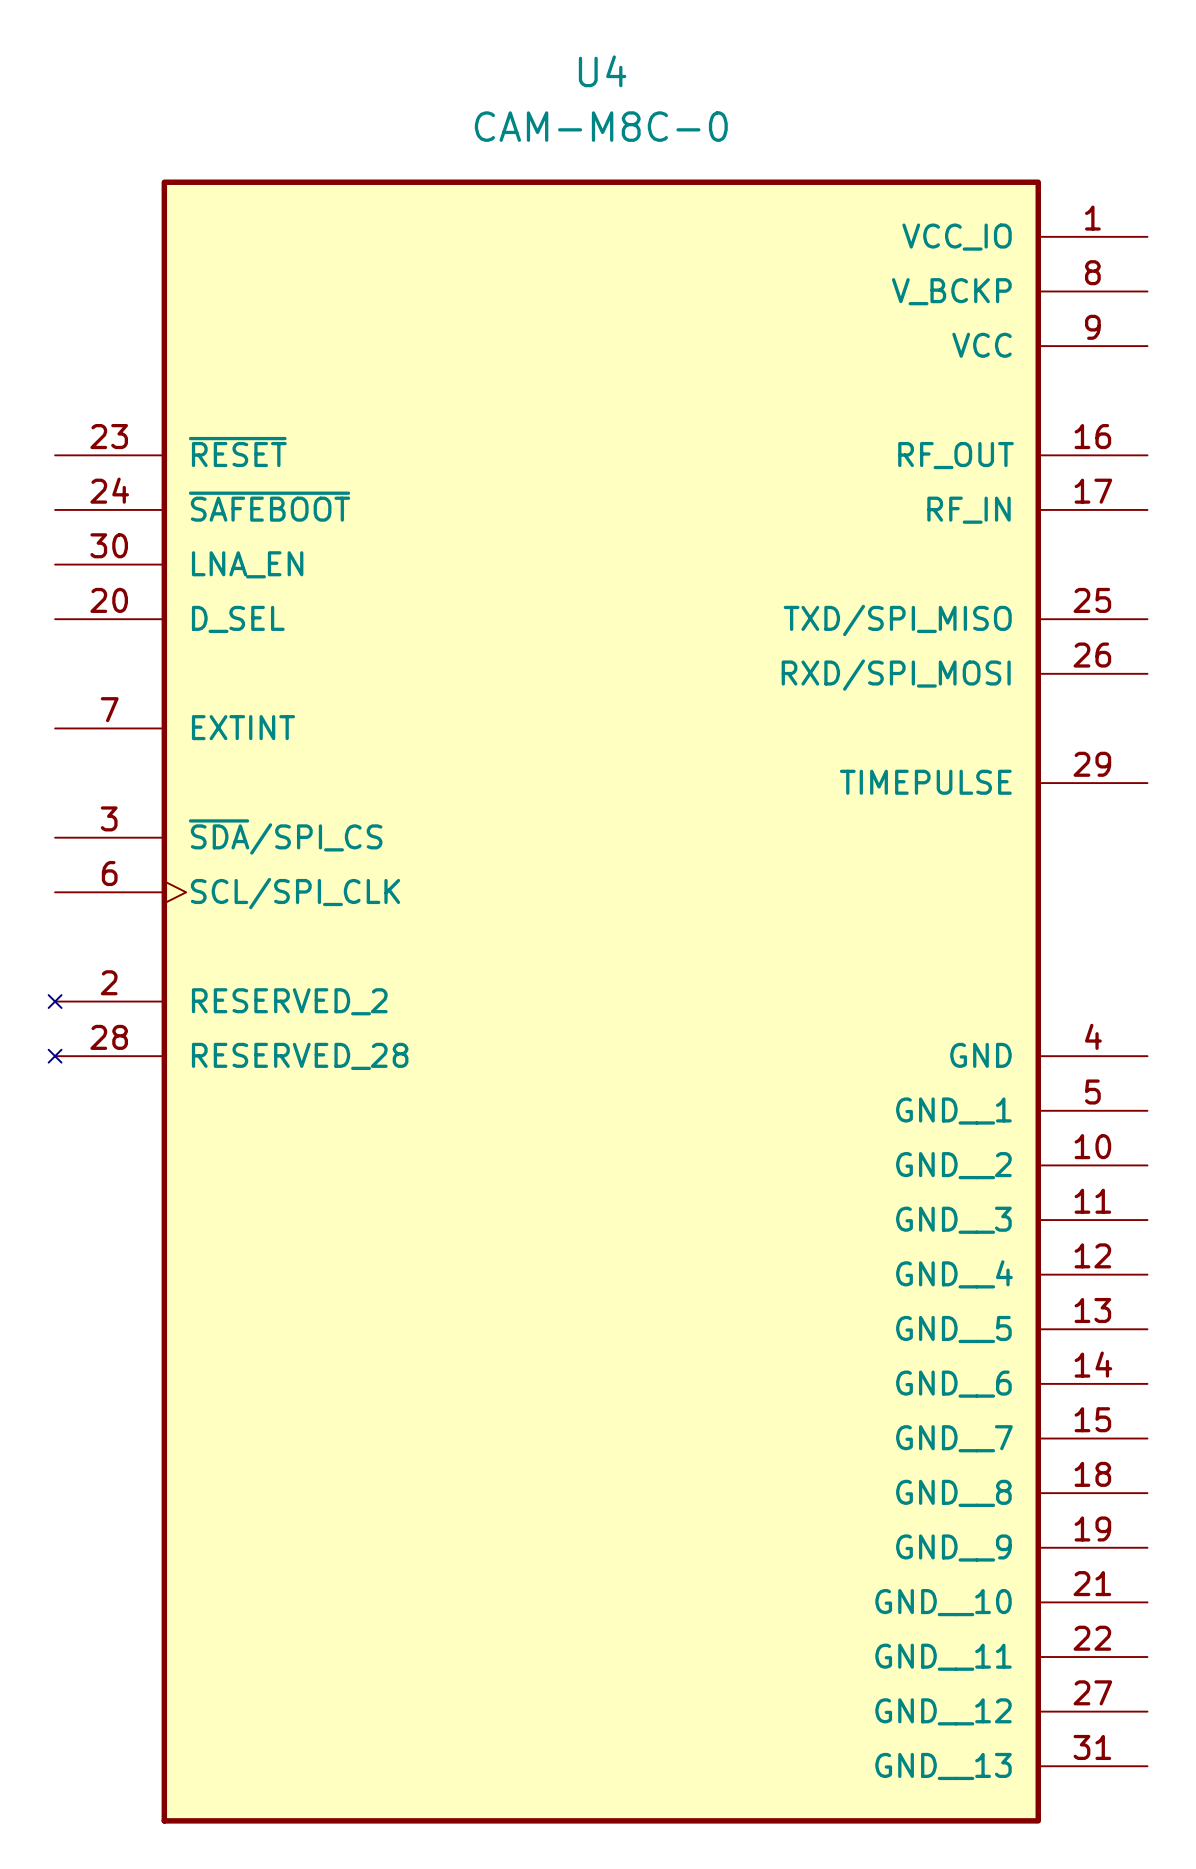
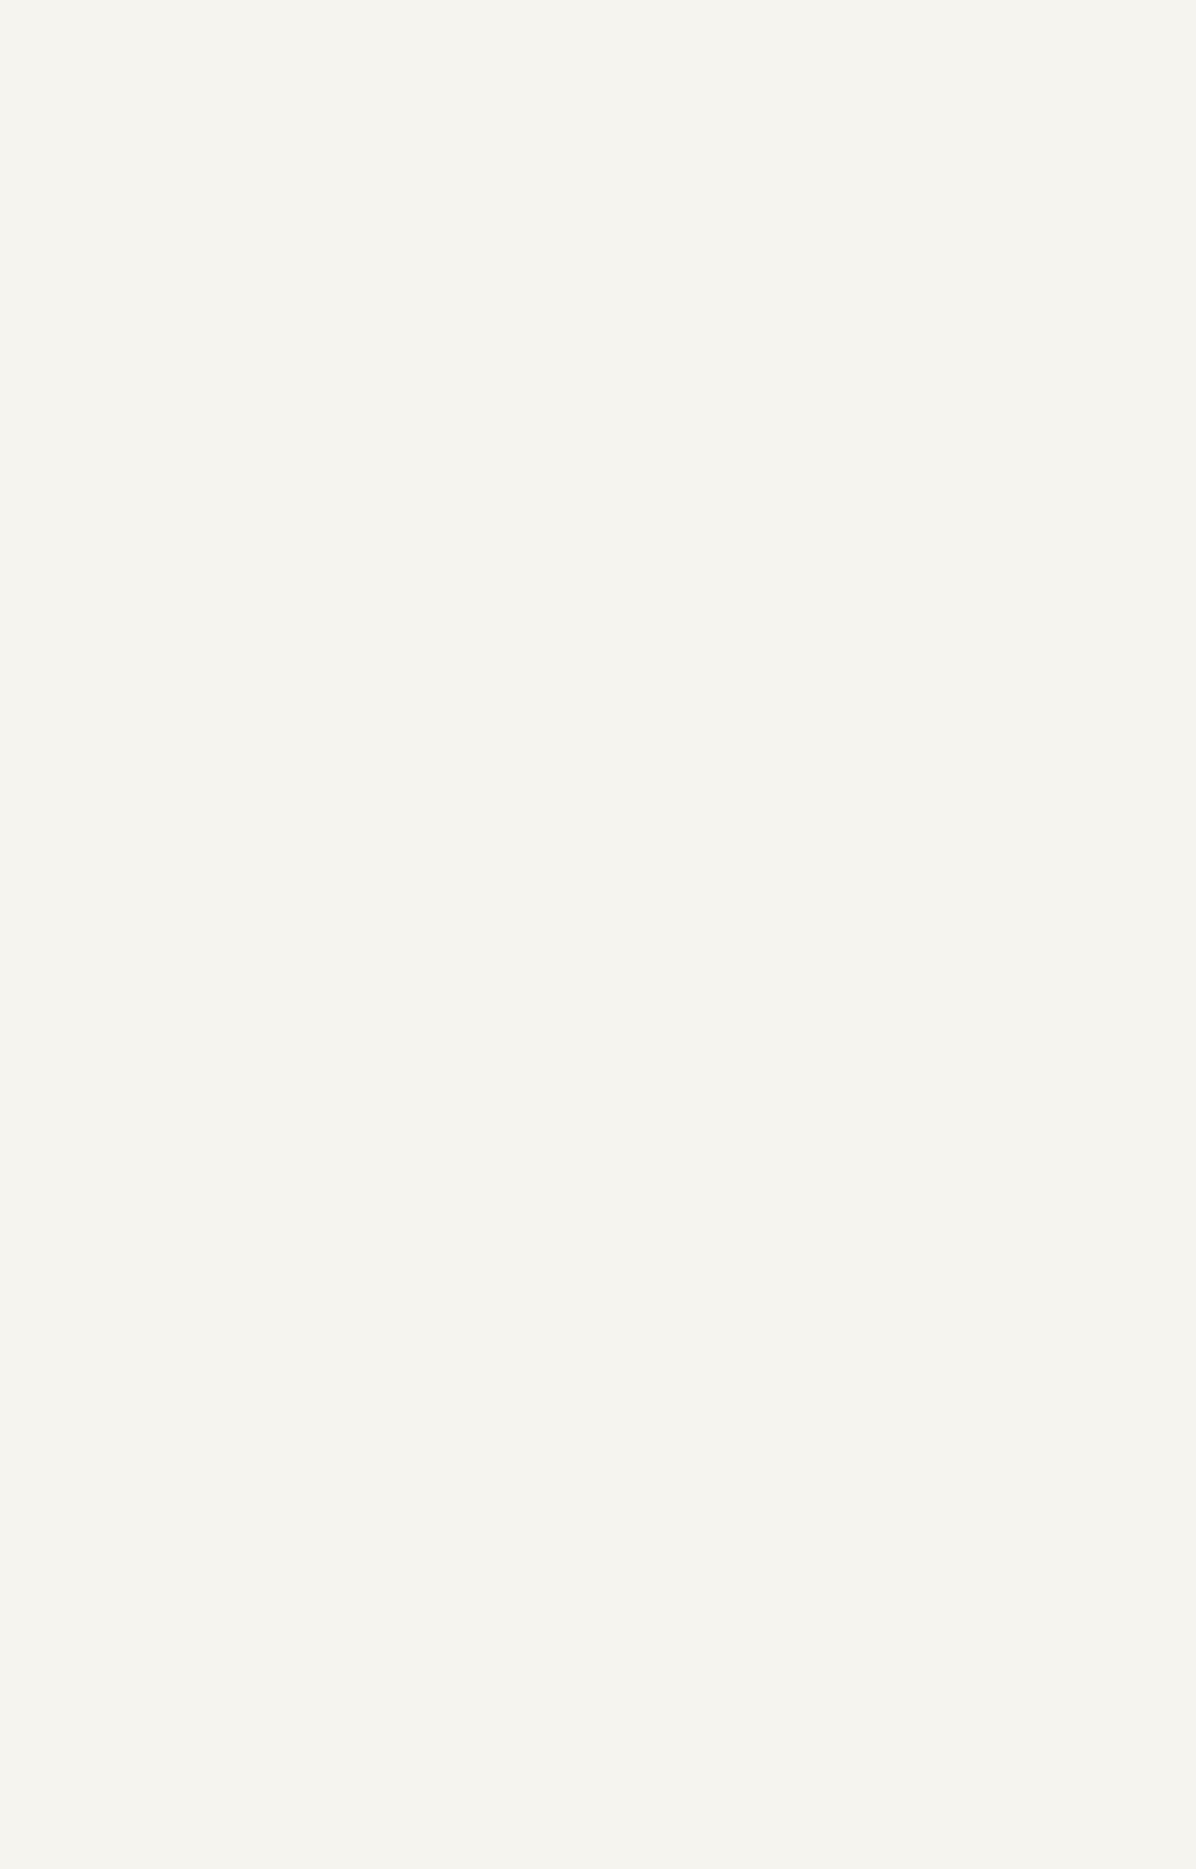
U4: CAM-M8C-0 (598, 1001) -> none

